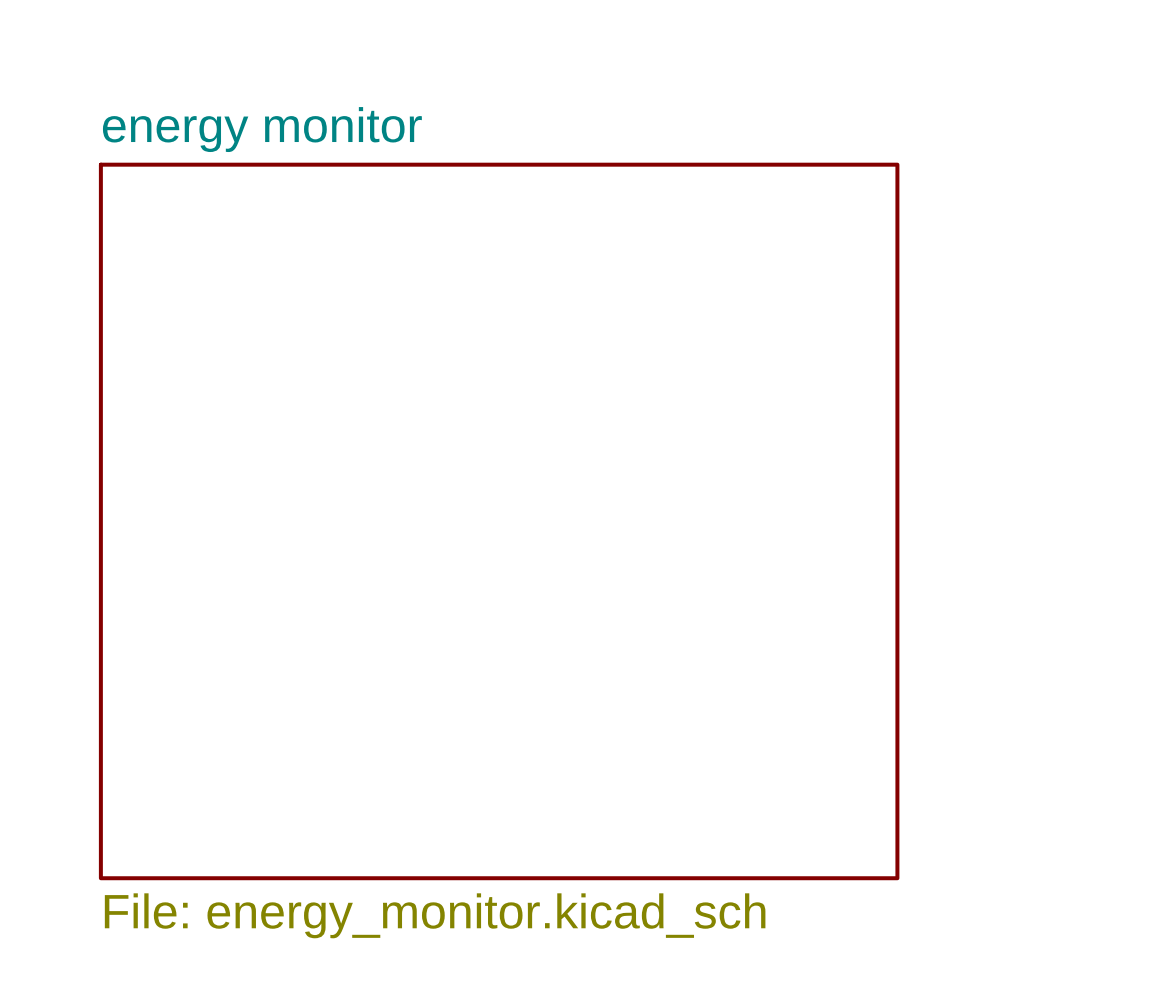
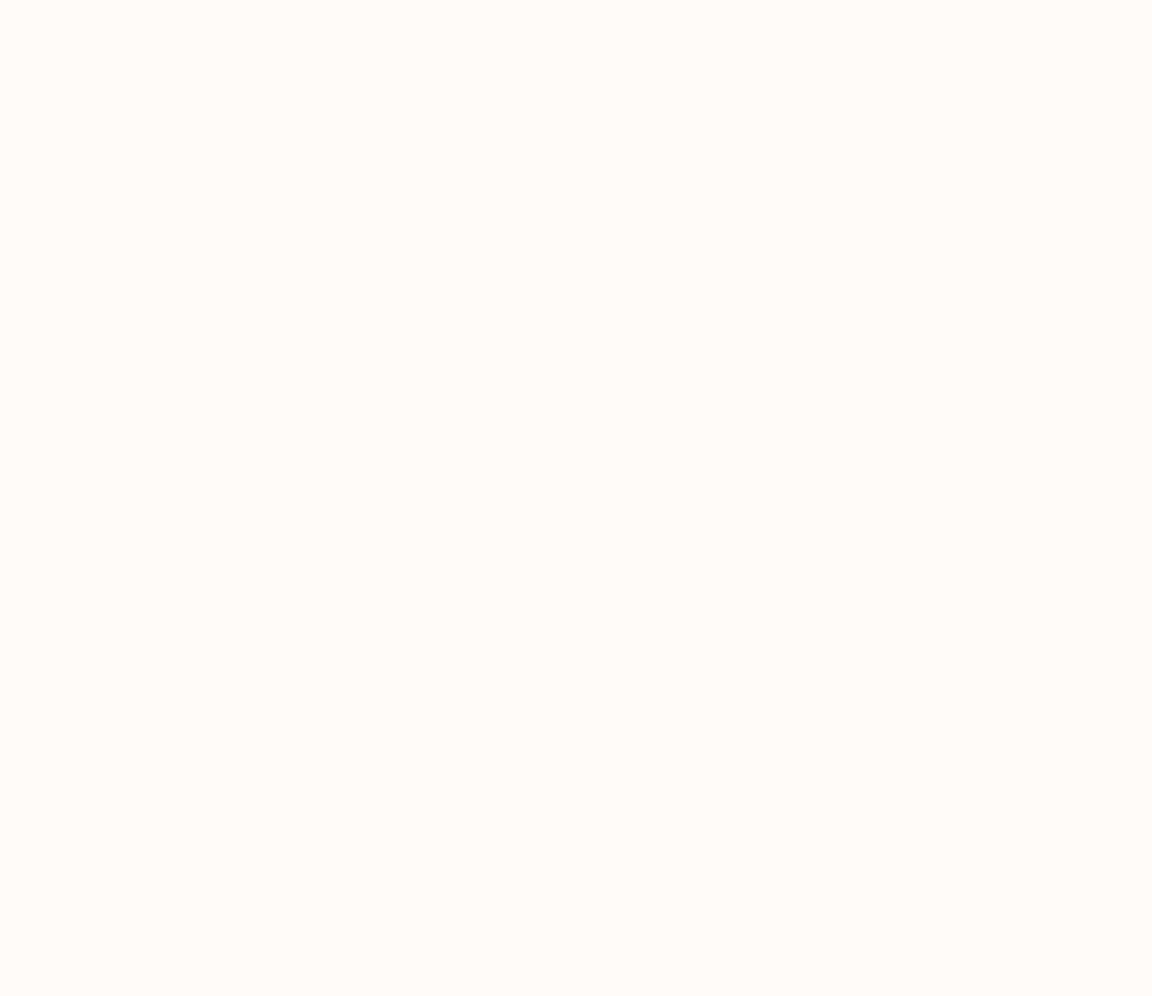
sheet energy monitor: File: energy_monitor.kicad_sch (499, 521) -> none

